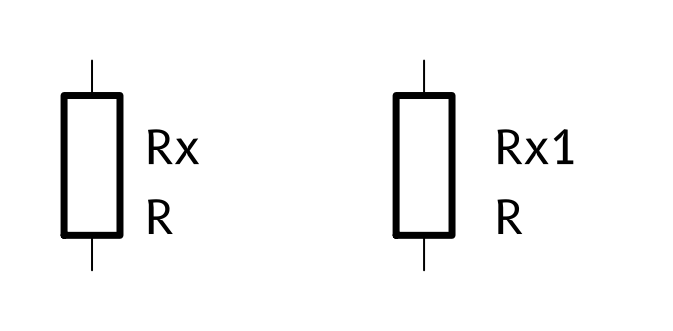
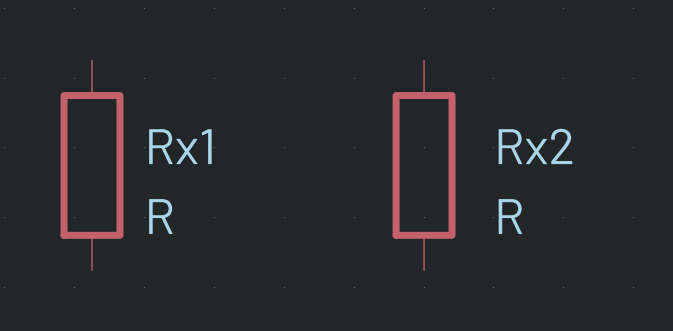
Rx name: Rx (173, 146) -> Rx1 (180, 146)
Rx1 name: Rx1 (535, 146) -> Rx2 (535, 146)

